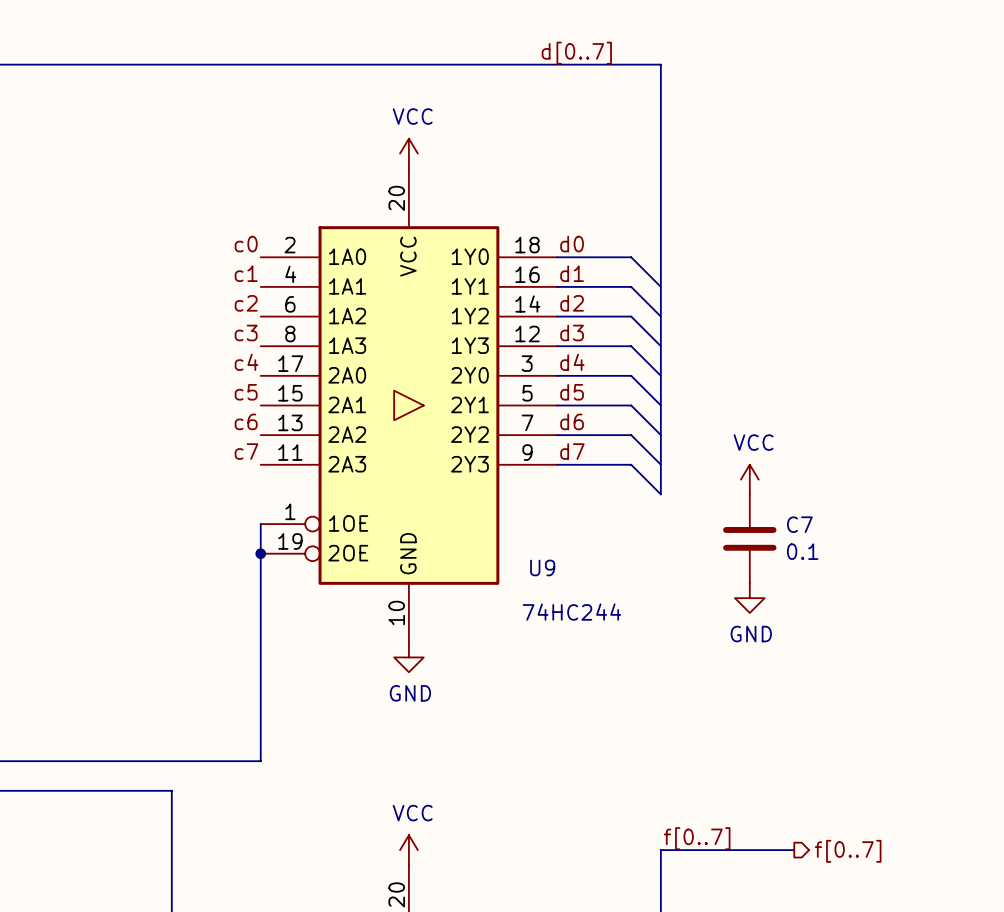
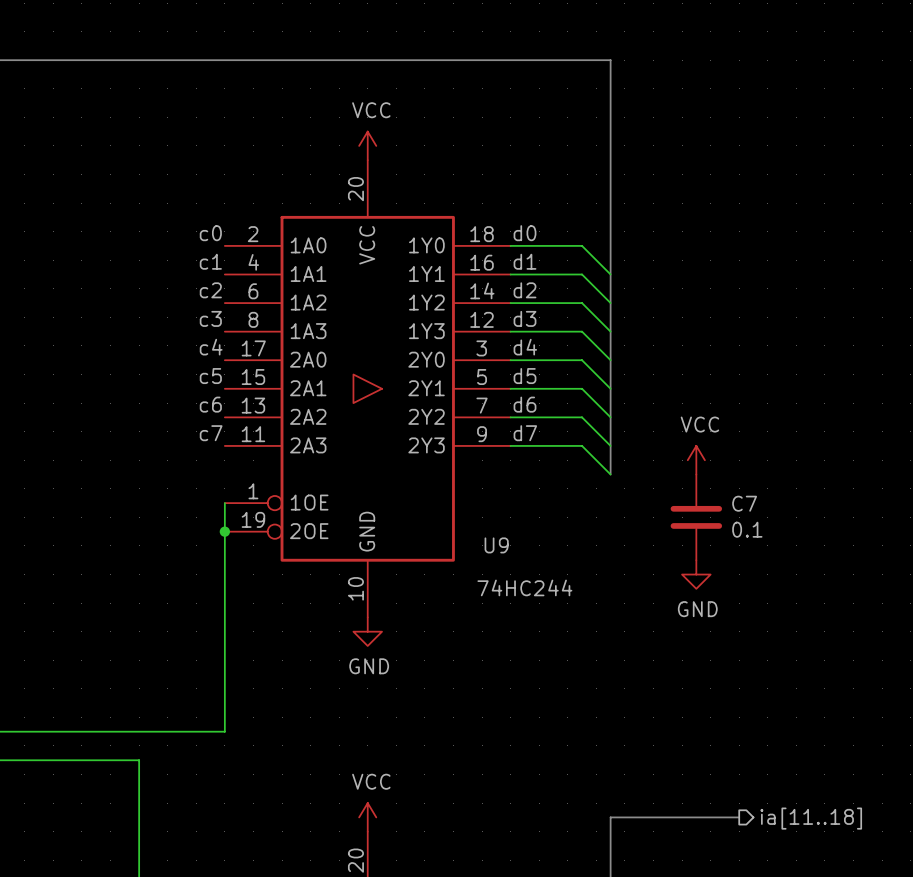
label: d[0..7] (576, 53) -> none
label: f[0..7] (697, 838) -> none
hierarchical label: f[0..7] (848, 851) -> ia[11..18] (811, 818)

